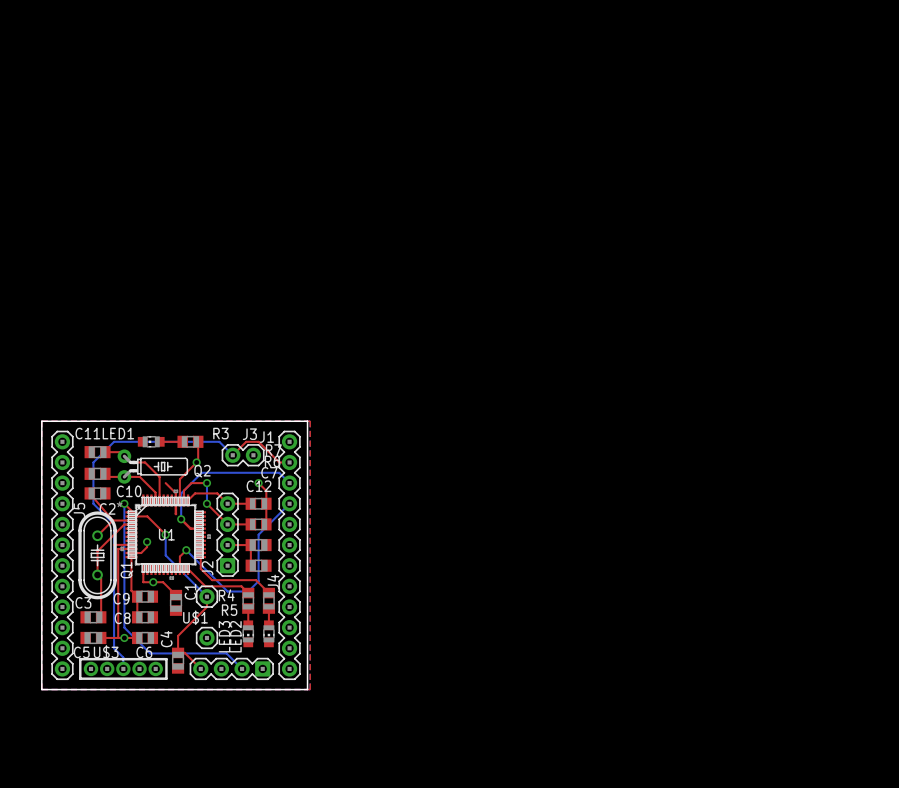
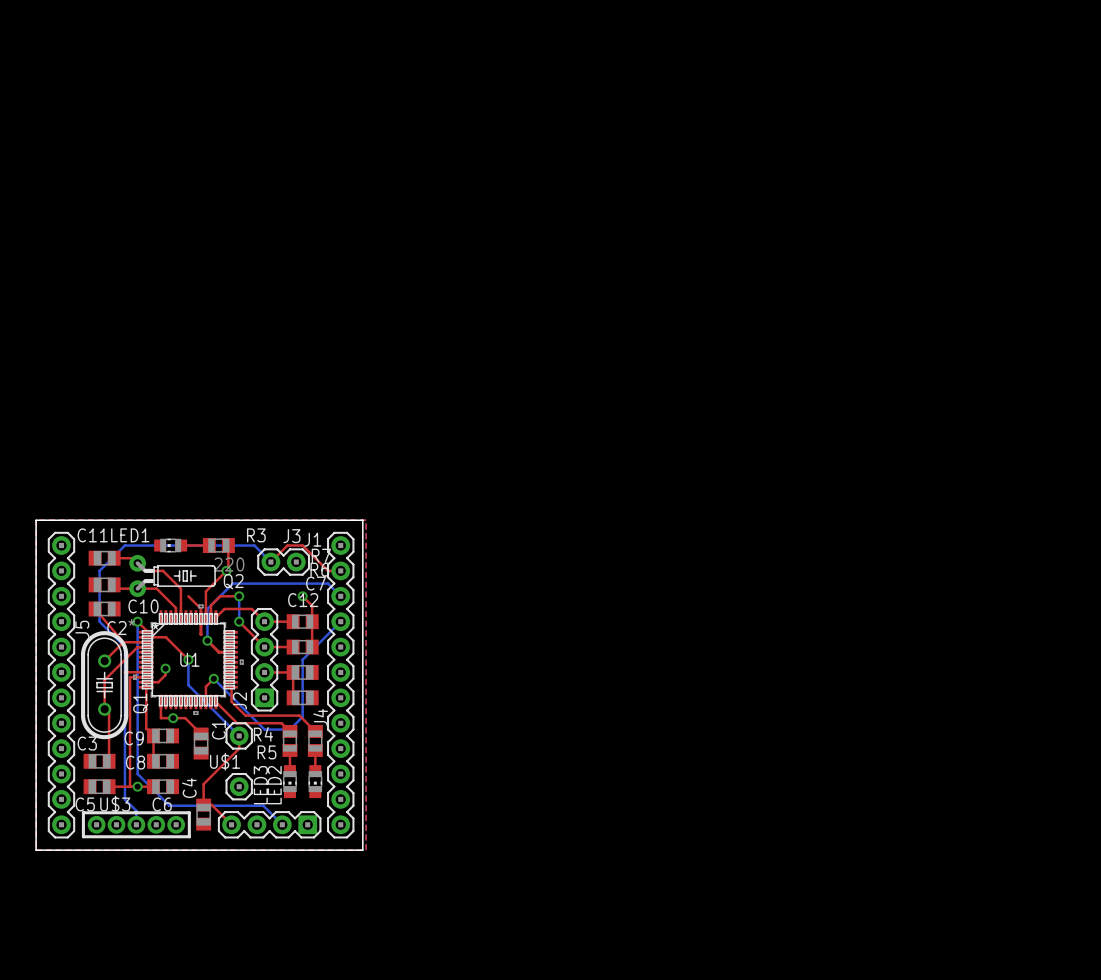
R3 value: none -> 220 (229, 564)

